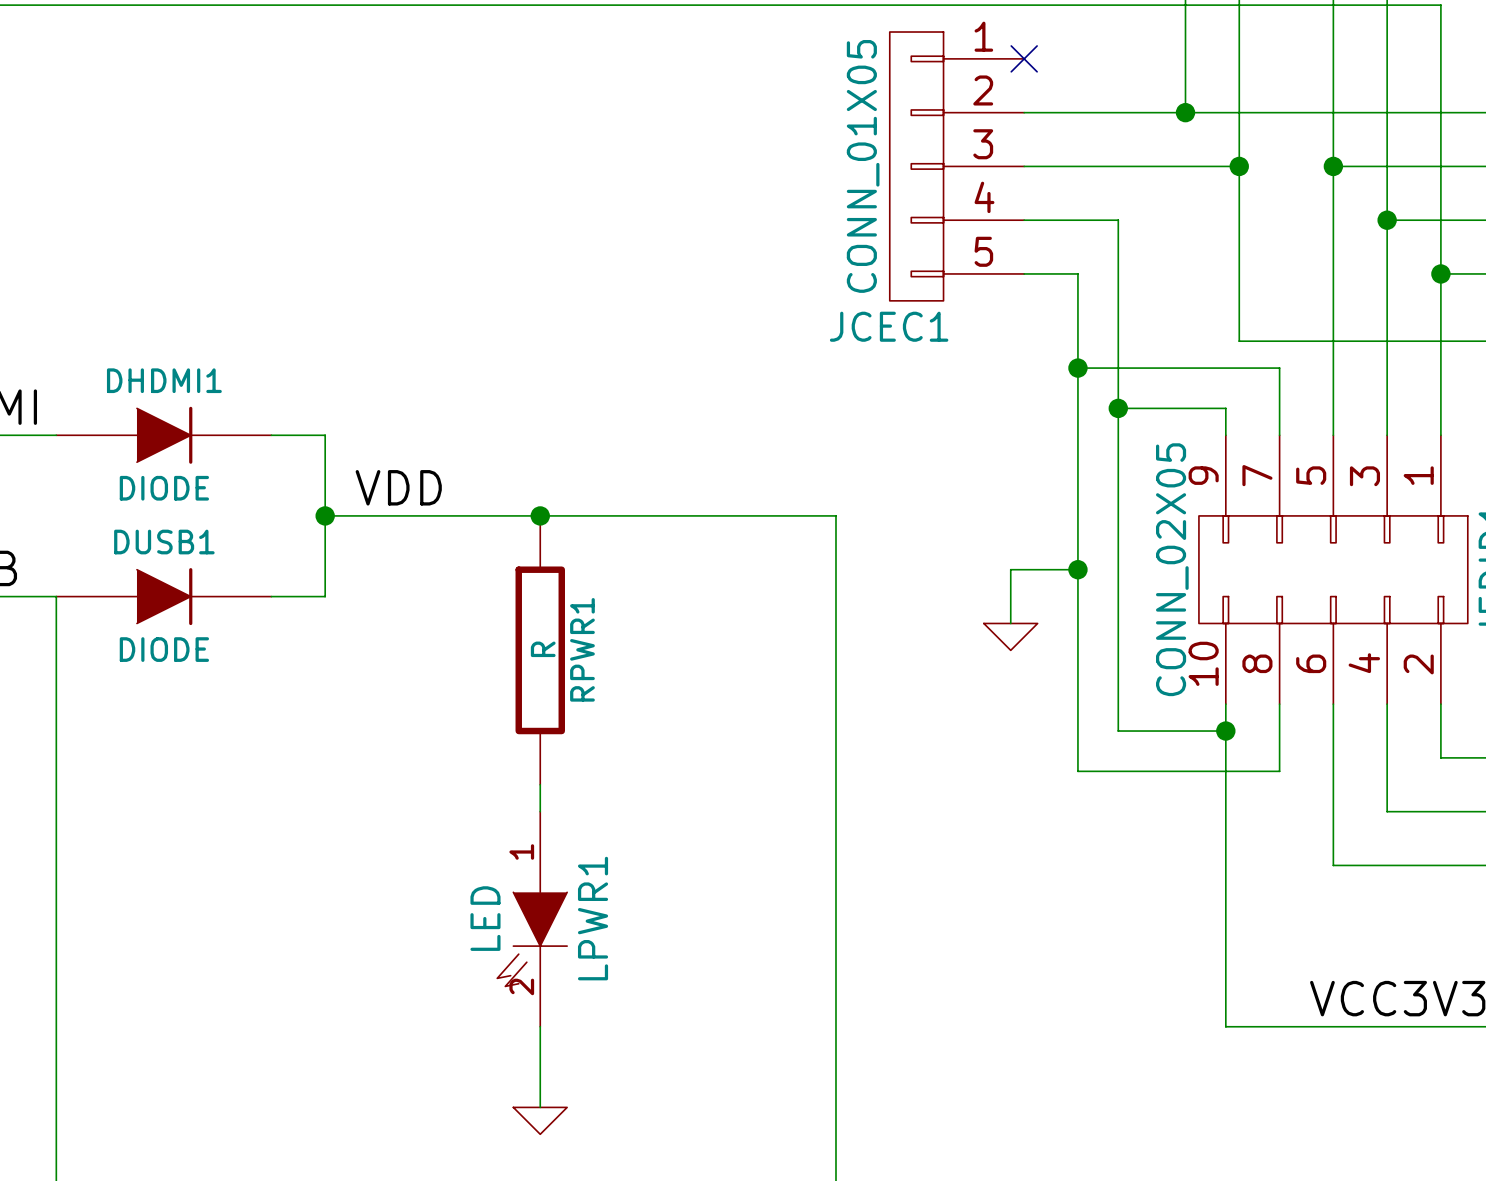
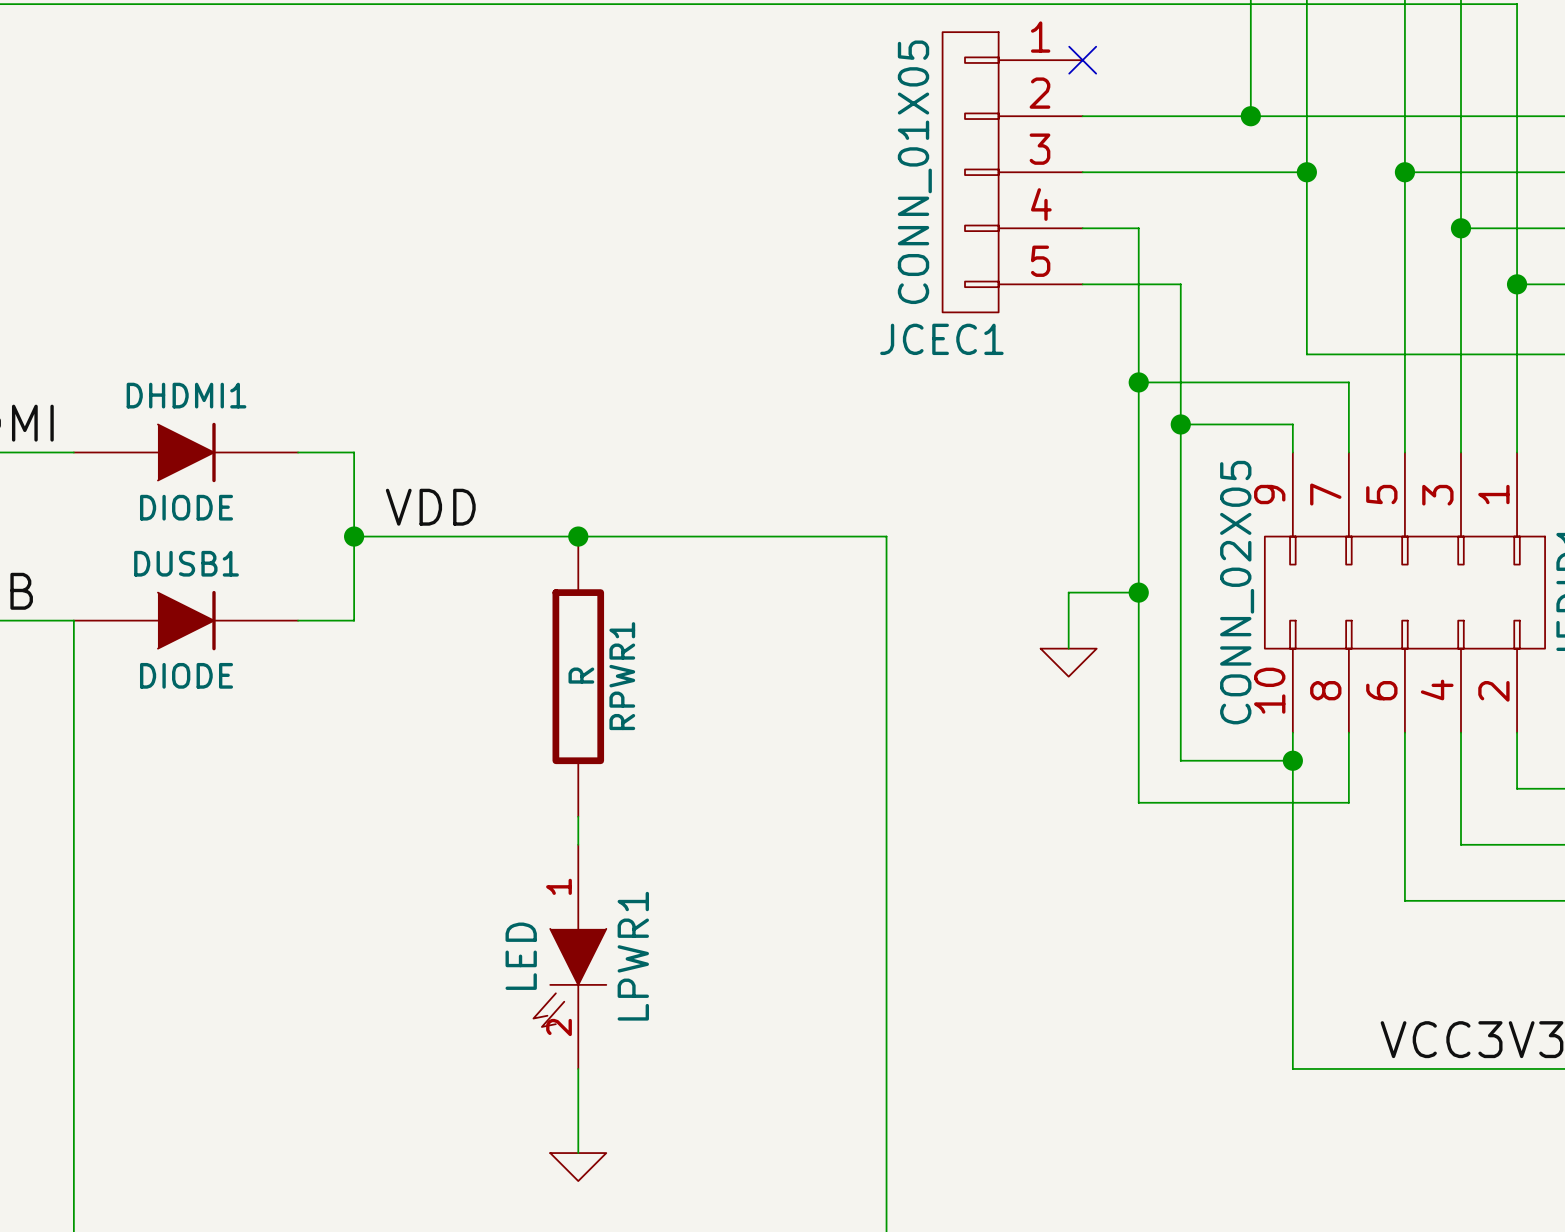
wire: (1077, 220) (1118, 220) (1118, 273) -> (1138, 228) (1138, 284) (1180, 284)

